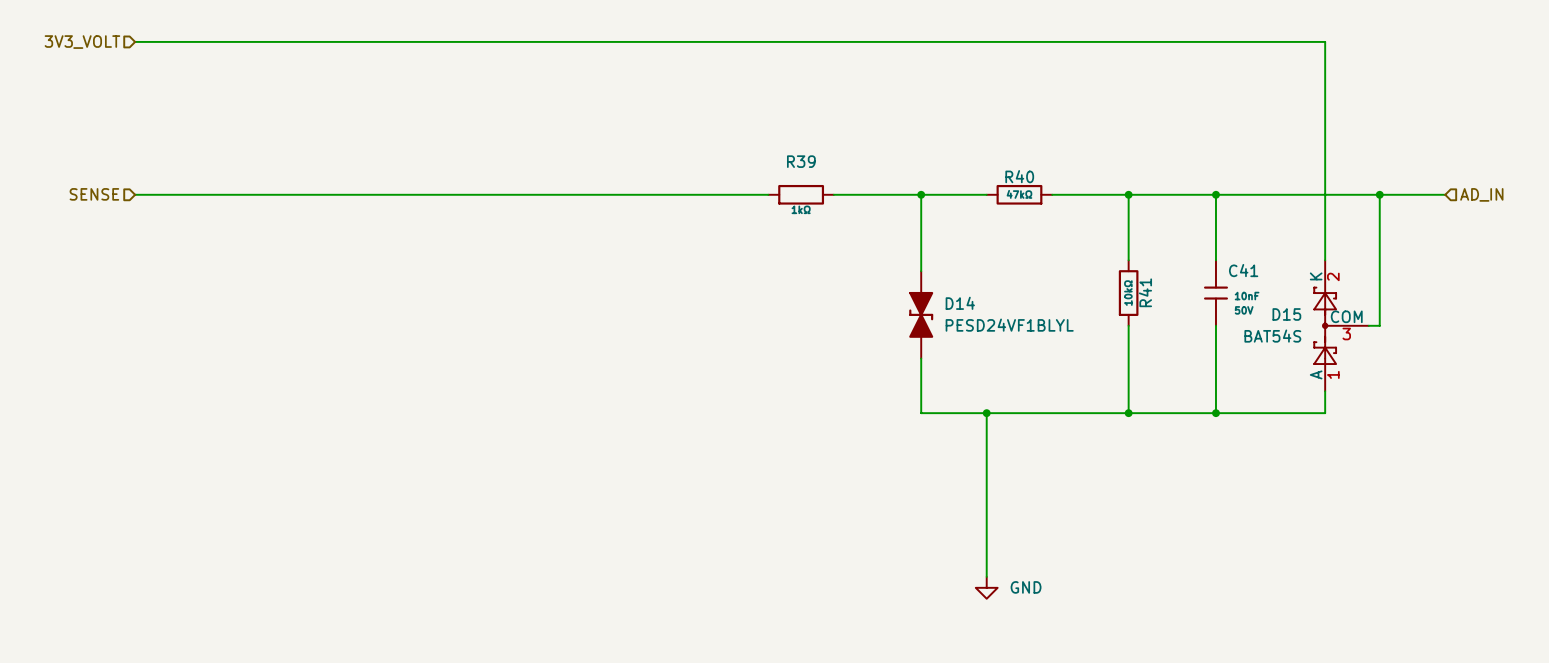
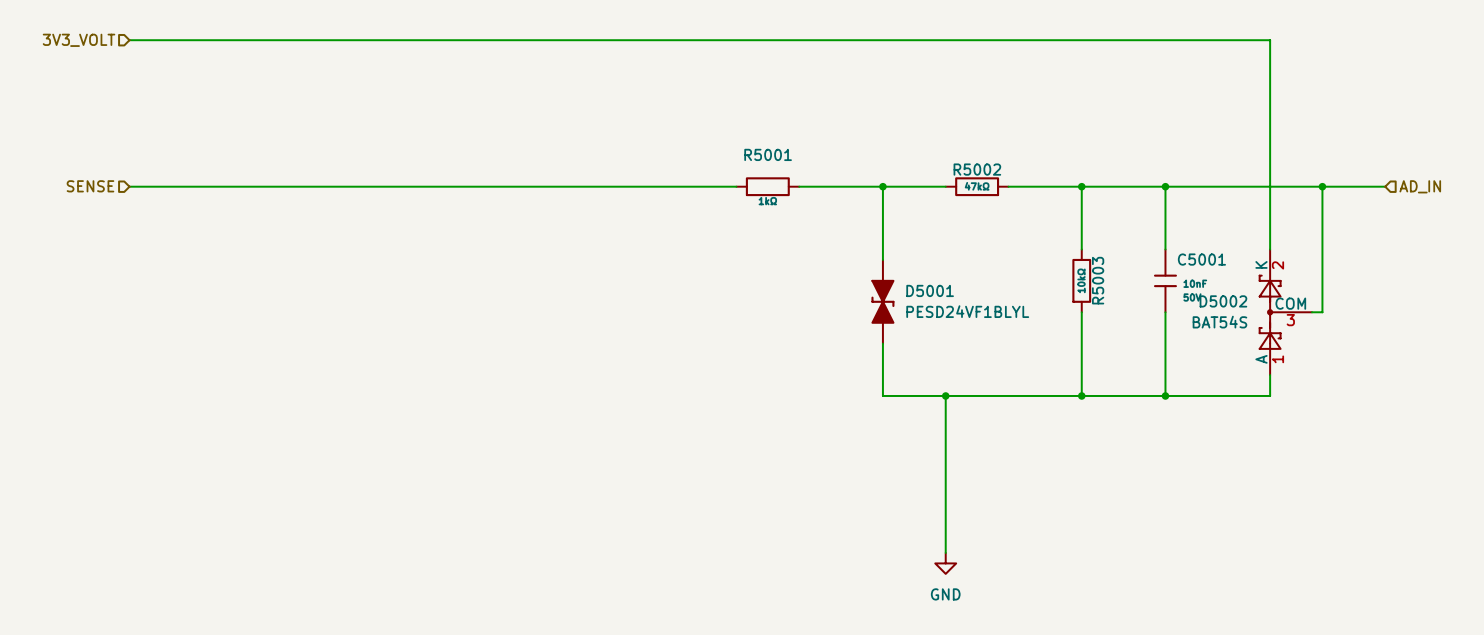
R39 name: R39 (801, 161) -> R5001 (768, 154)
R40 name: R40 (1019, 176) -> R5002 (977, 169)
C41 name: C41 (1243, 270) -> C5001 (1201, 259)
R41 name: R41 (1145, 292) -> R5003 (1098, 280)
D14 name: D14 (960, 303) -> D5001 (930, 290)
D15 name: D15 (1286, 314) -> D5002 (1223, 301)
power symbol text position: GND (1026, 587) -> GND (945, 594)

